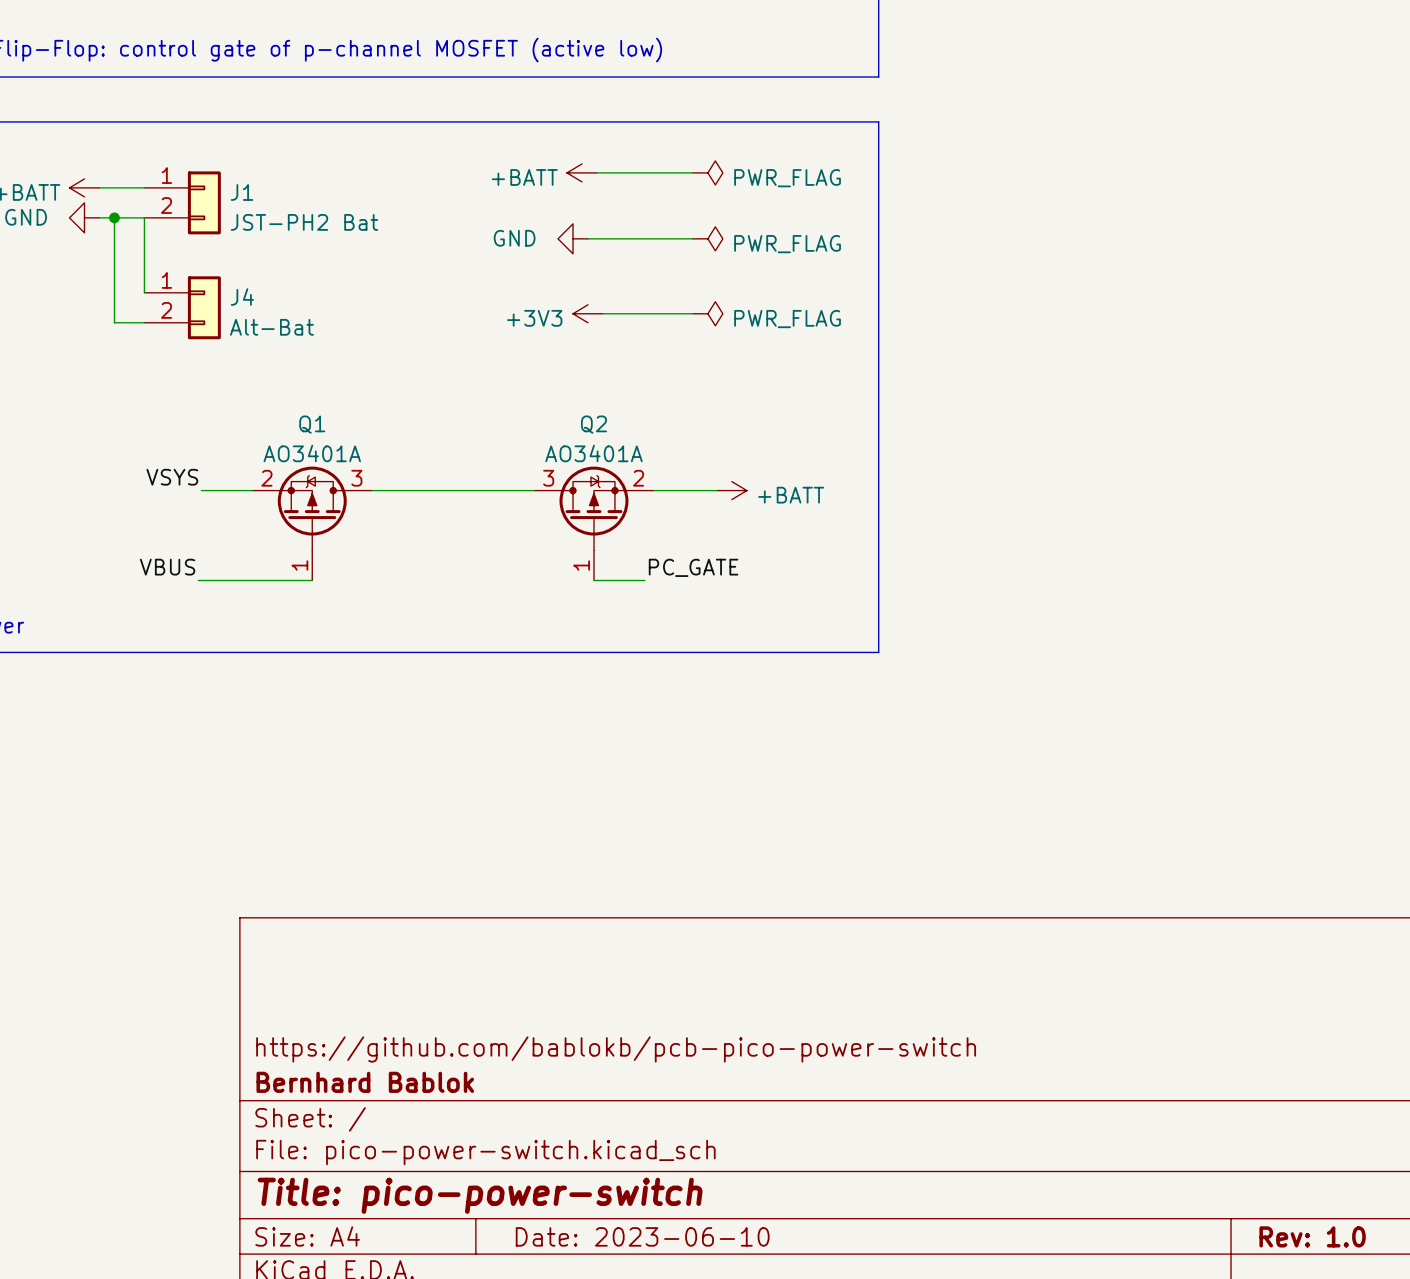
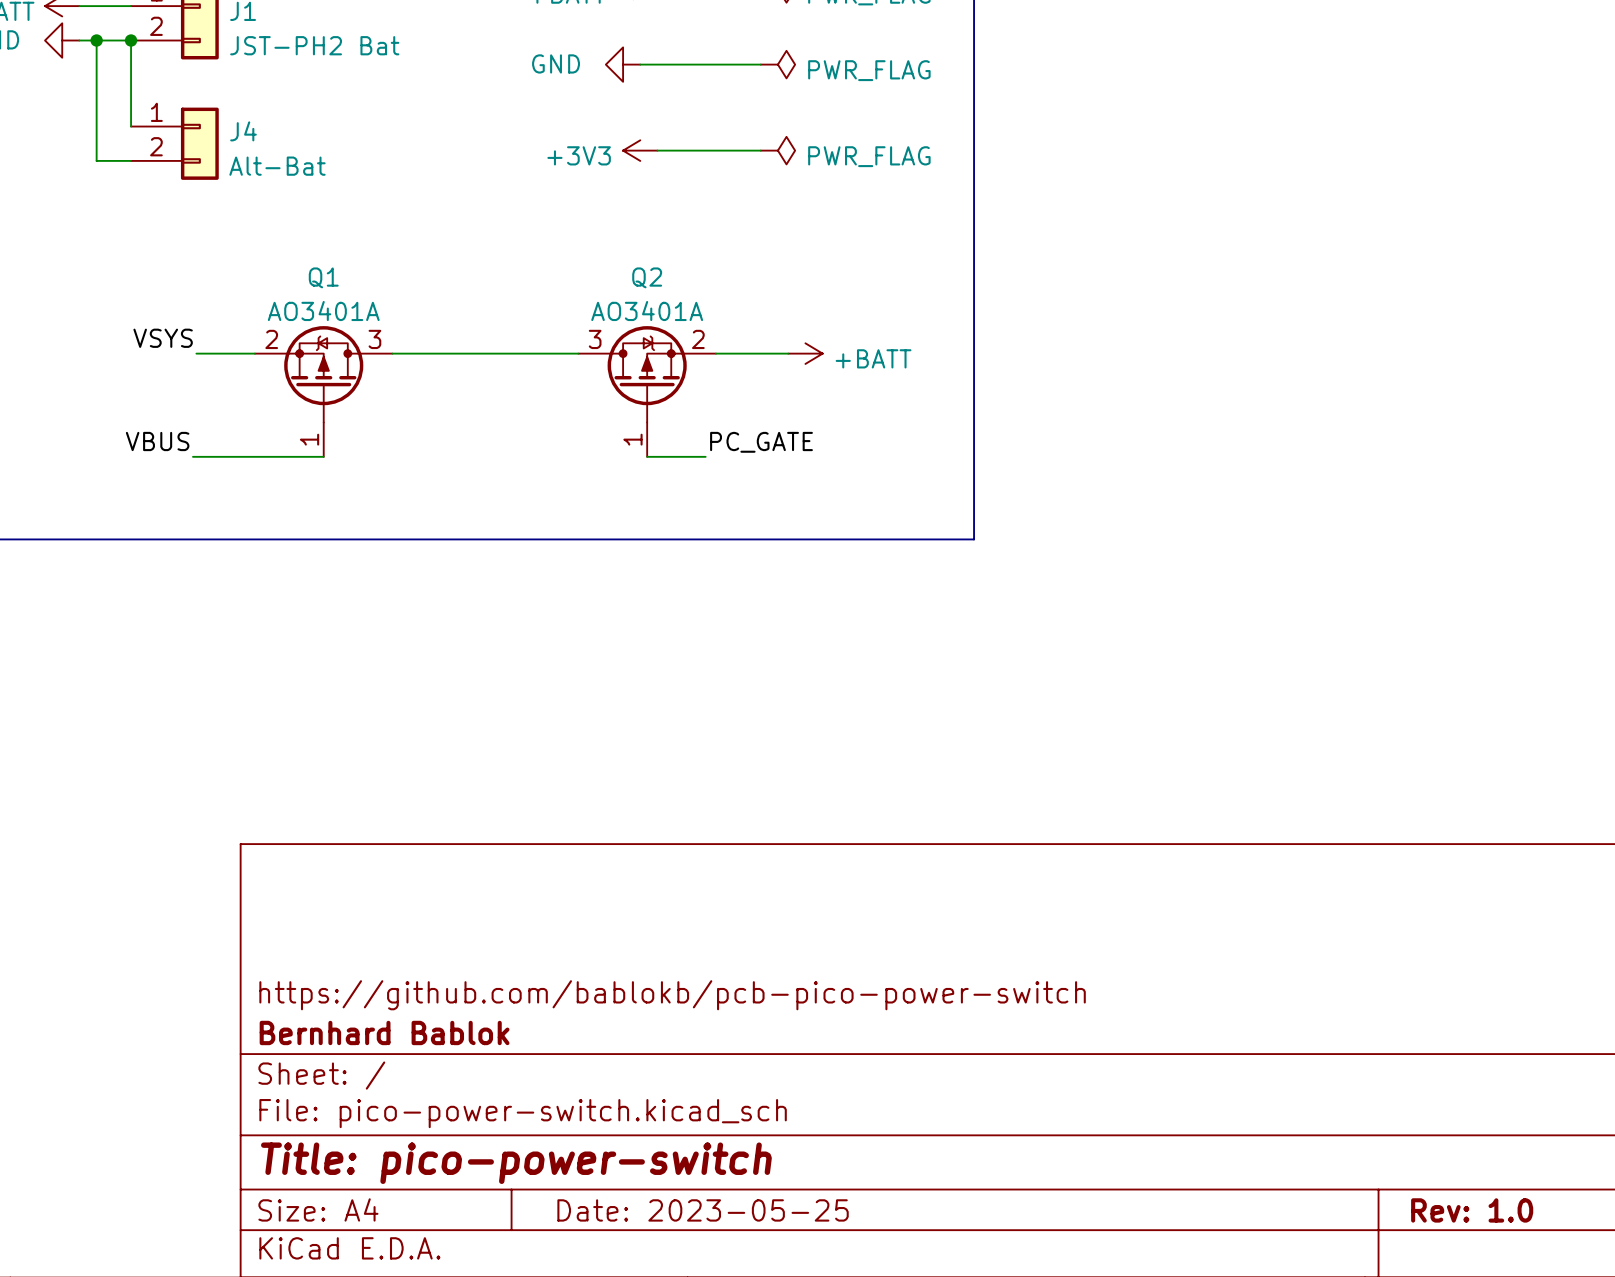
junction: none -> (131, 40)
title block: Date: 2023-06-10 (642, 1236) -> Date: 2023-05-25 (703, 1210)

